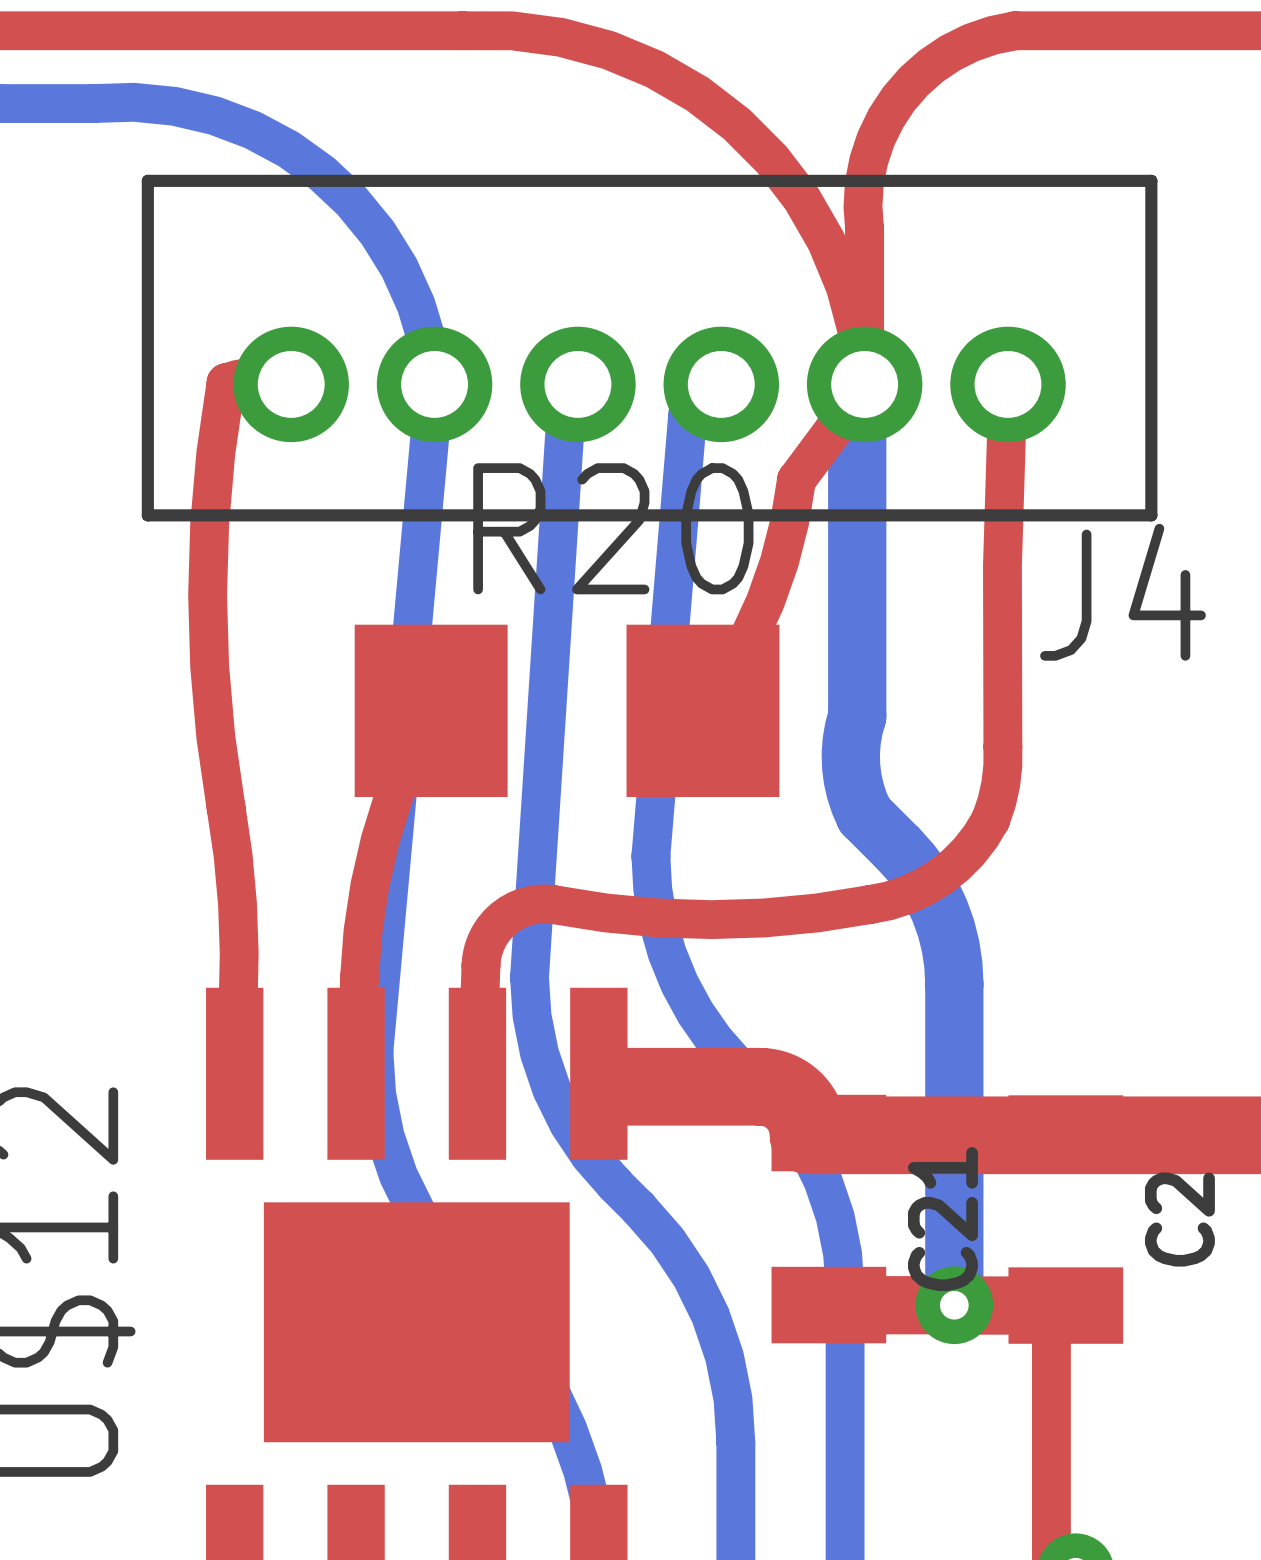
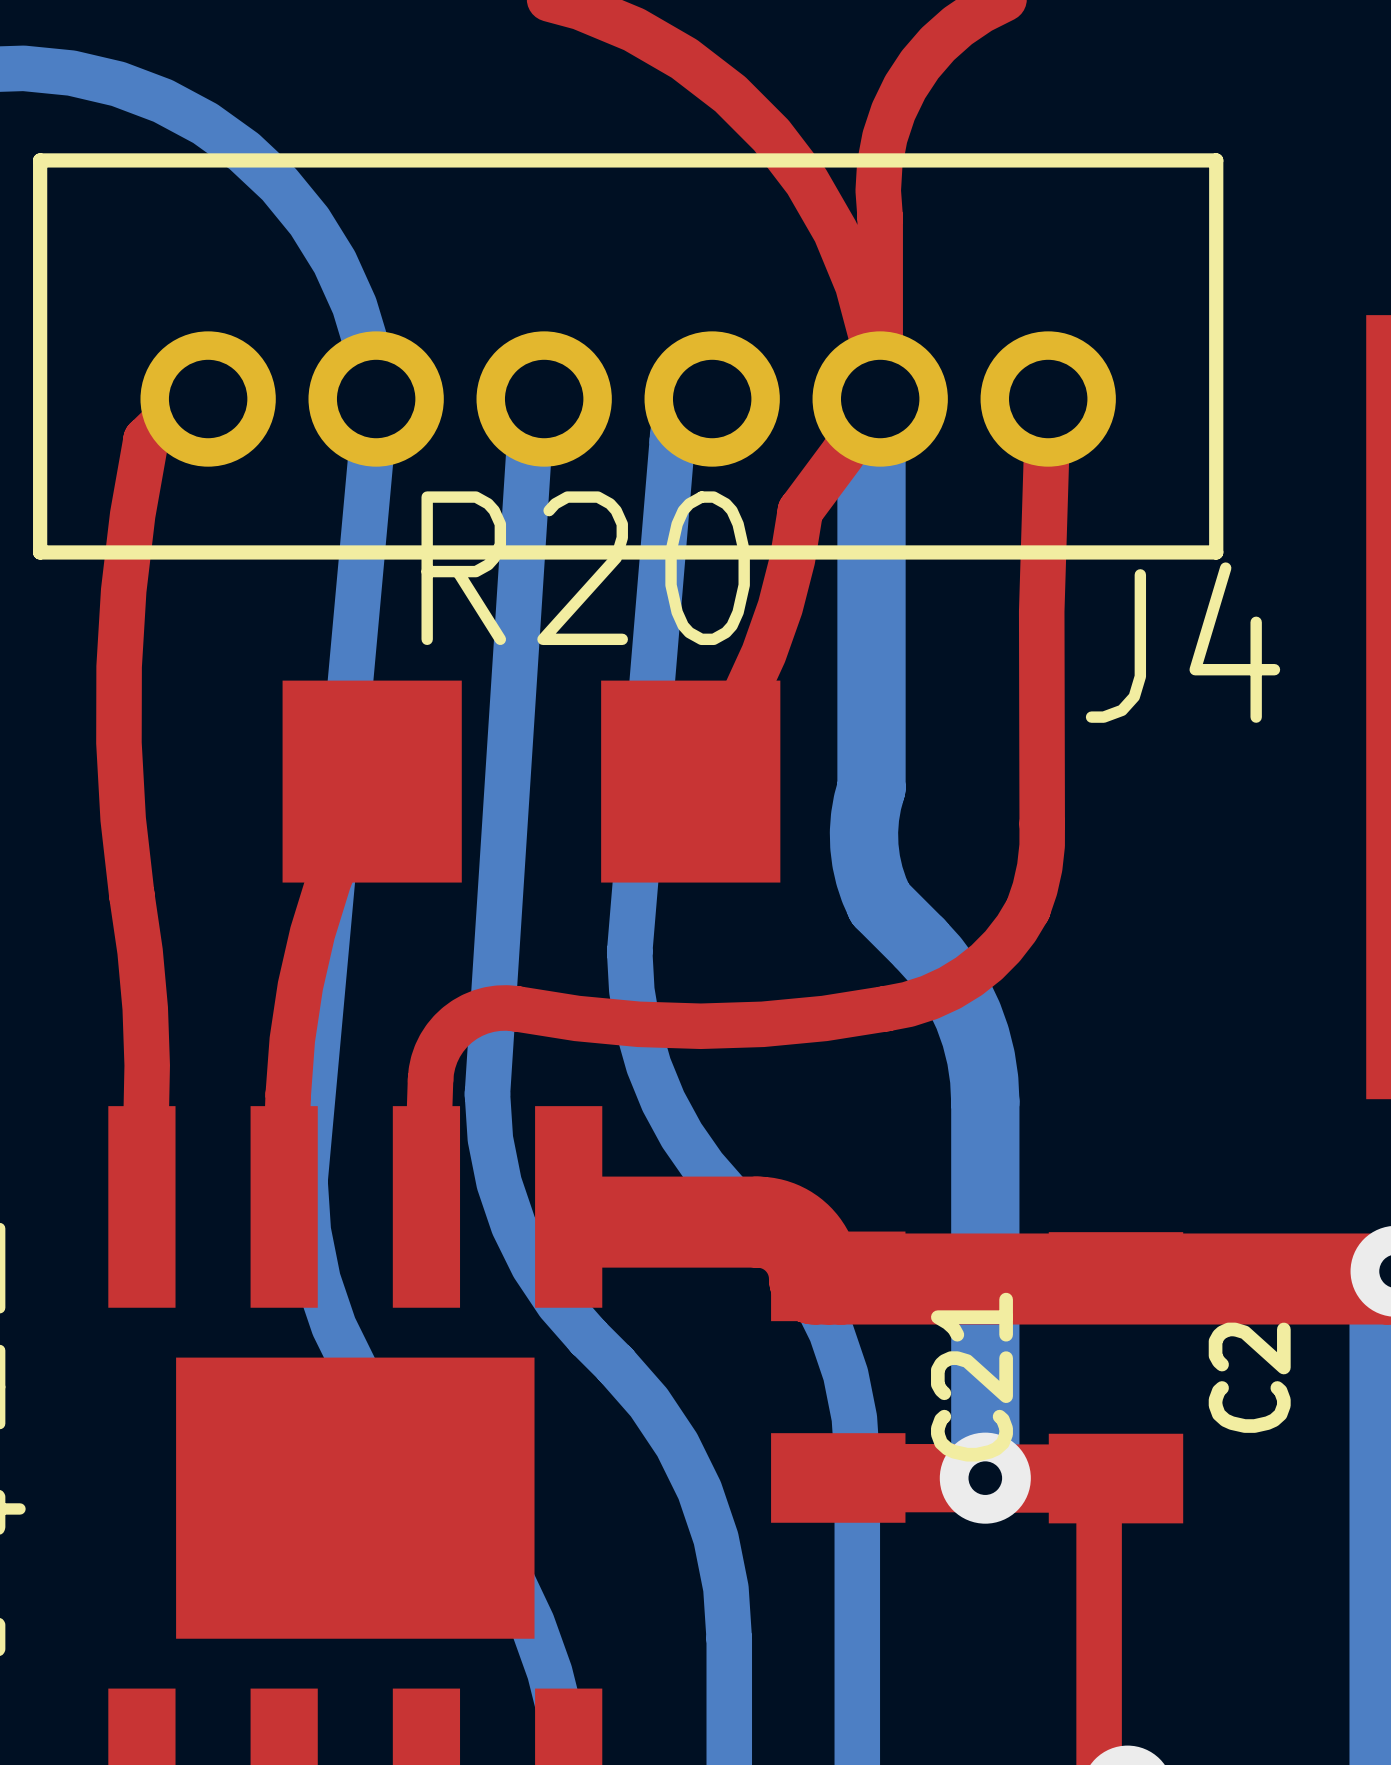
top track: (291, 384) (258, 377) (226, 382) (215, 453) (209, 524) (207, 595) (209, 666) (215, 737) (226, 807) -> (208, 399) (190, 403) (173, 412) (146, 439) (132, 514) (123, 590) (119, 666) (118, 742) (123, 819) (131, 894)

